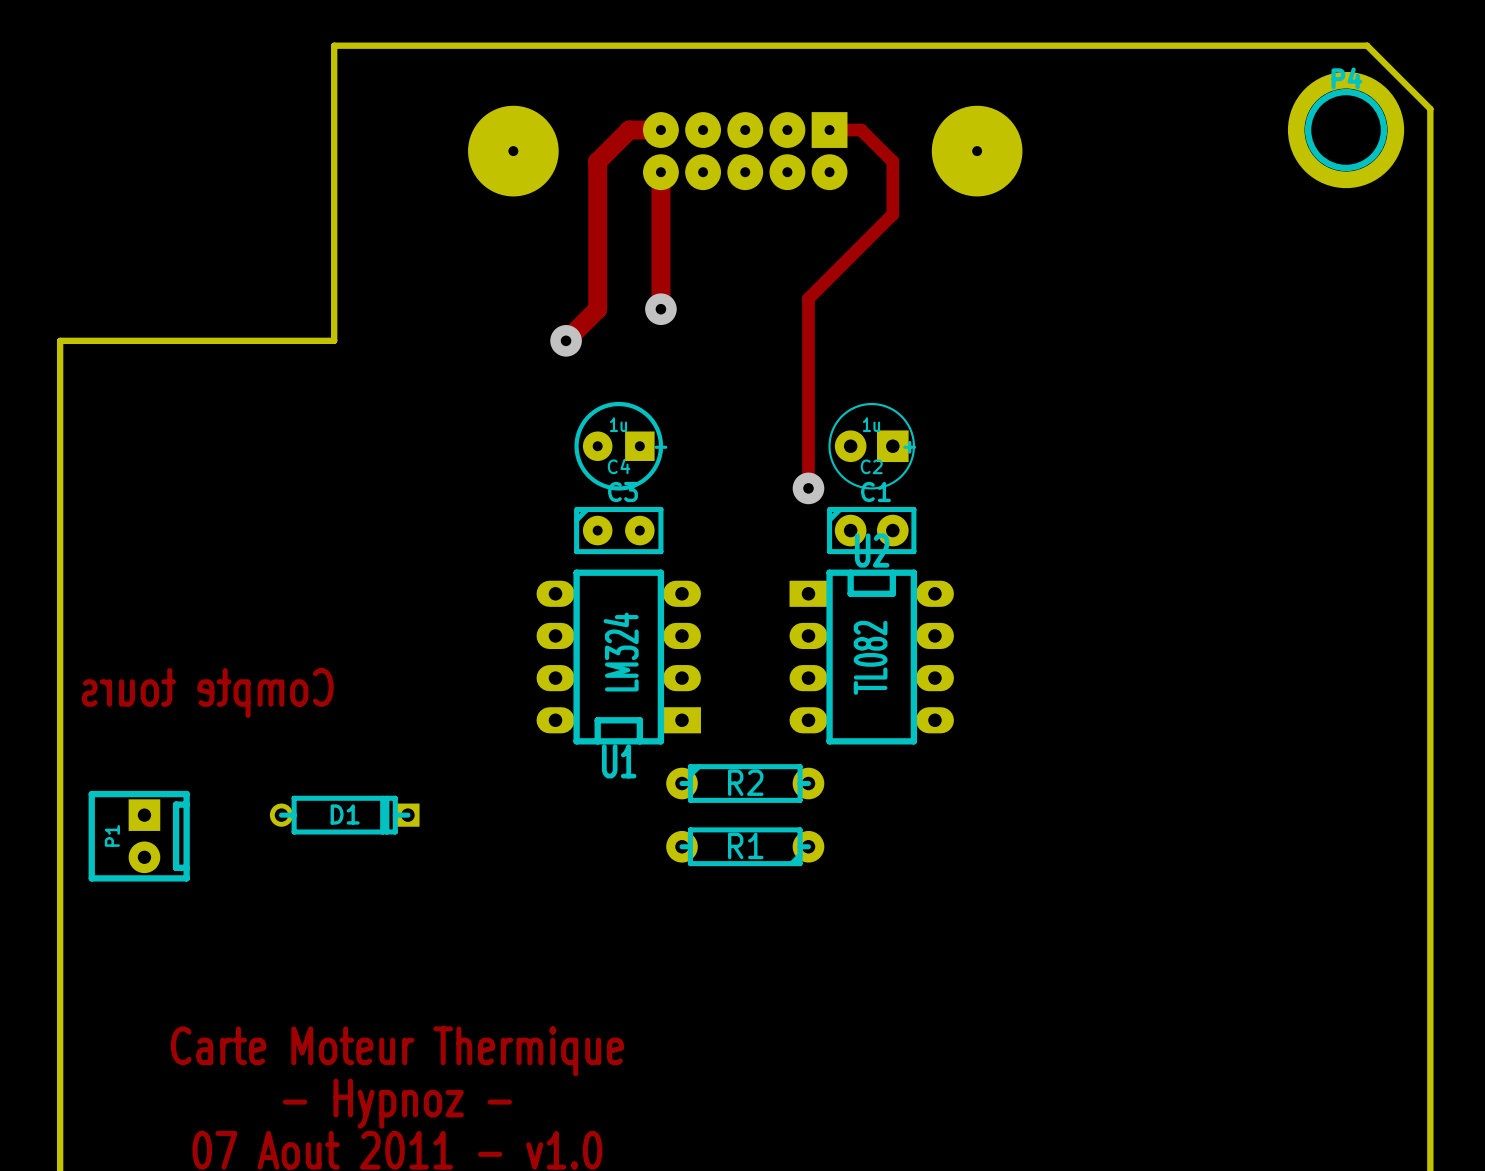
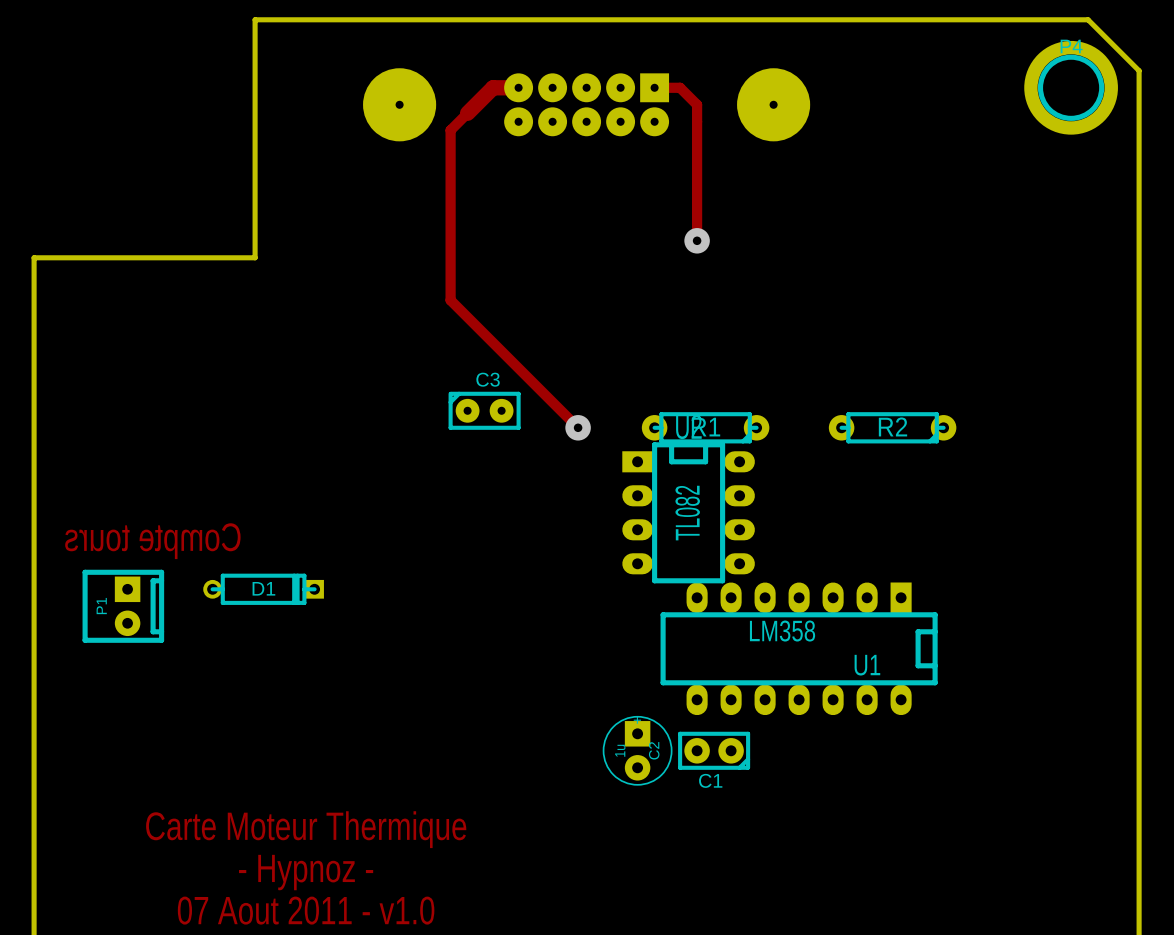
track: (882, 151) (892, 161) (892, 214) (808, 298) (808, 488) -> (697, 104) (697, 240)
track: (597, 161) (597, 309) (566, 340) -> (467, 113) (450, 130) (450, 300) (578, 427)
track: (660, 172) (660, 309) -> none
via: (660, 309) -> none
via: none -> (697, 240)
via: (566, 340) -> none
C4: 1u (618, 446) -> none
C2 rotation: 0° (871, 446) -> 90° counterclockwise (637, 750)
C2 position: (871, 446) -> (637, 750)
via: (808, 488) -> none
C1 rotation: 0° (871, 530) -> 180° (714, 750)
C1 position: (871, 530) -> (714, 750)
via: none -> (578, 427)
U1 footprint: [536, 569, 701, 745] -> [660, 582, 938, 716]
U1 value: LM324 (621, 652) -> LM358 (782, 631)
U1 name position: U1 (619, 761) -> U1 (867, 665)
R2 rotation: 0° (745, 783) -> 180° (892, 427)
R2 position: (745, 783) -> (892, 427)
D1 position: (344, 815) -> (263, 589)
P1 position: (139, 836) -> (123, 606)
R1 position: (745, 846) -> (705, 427)

